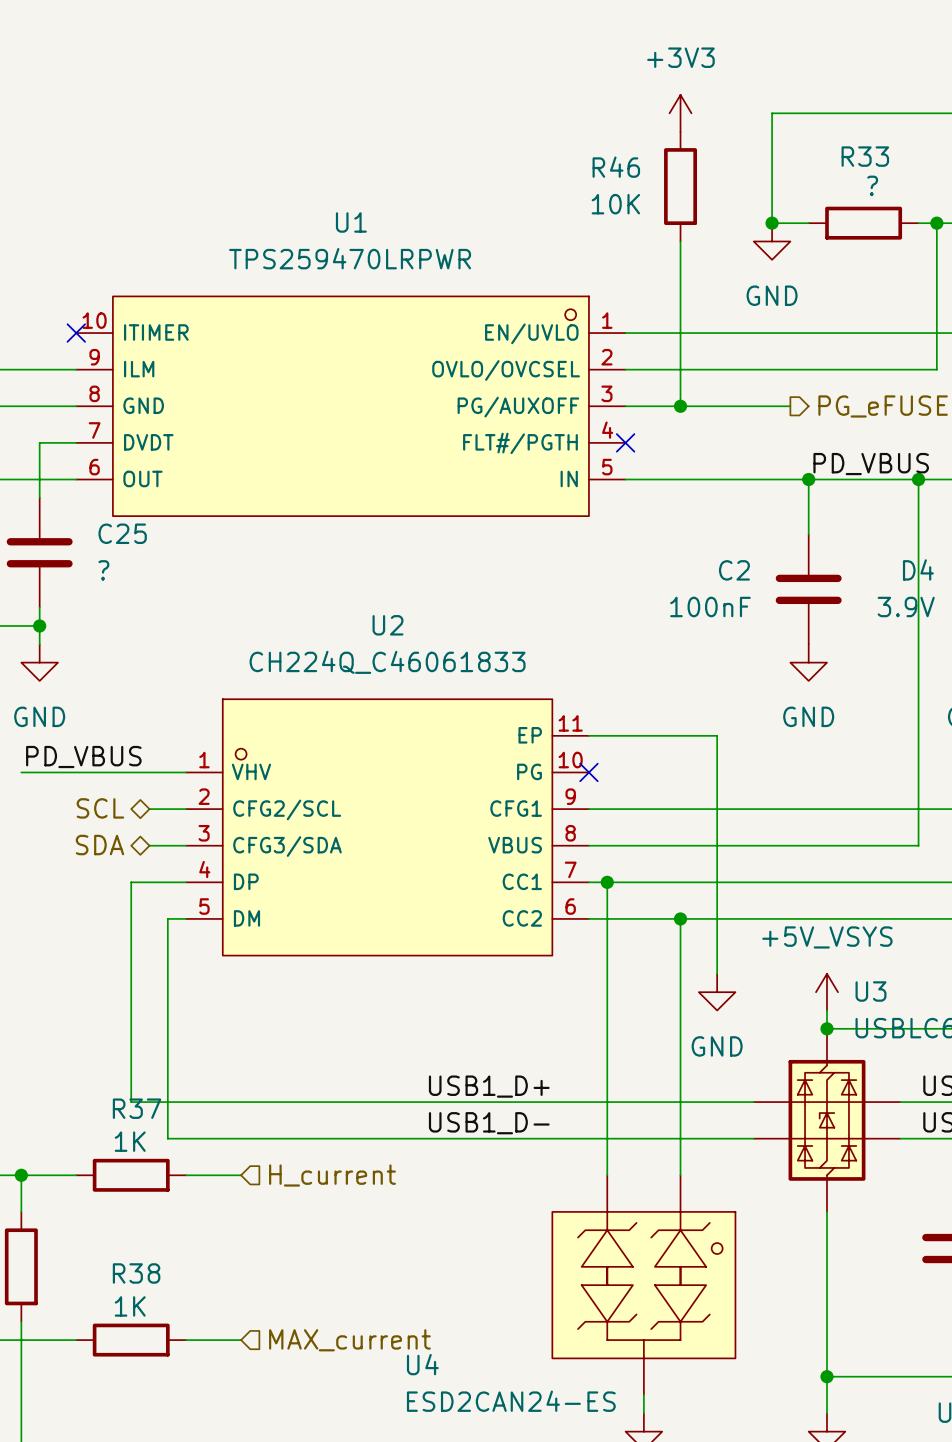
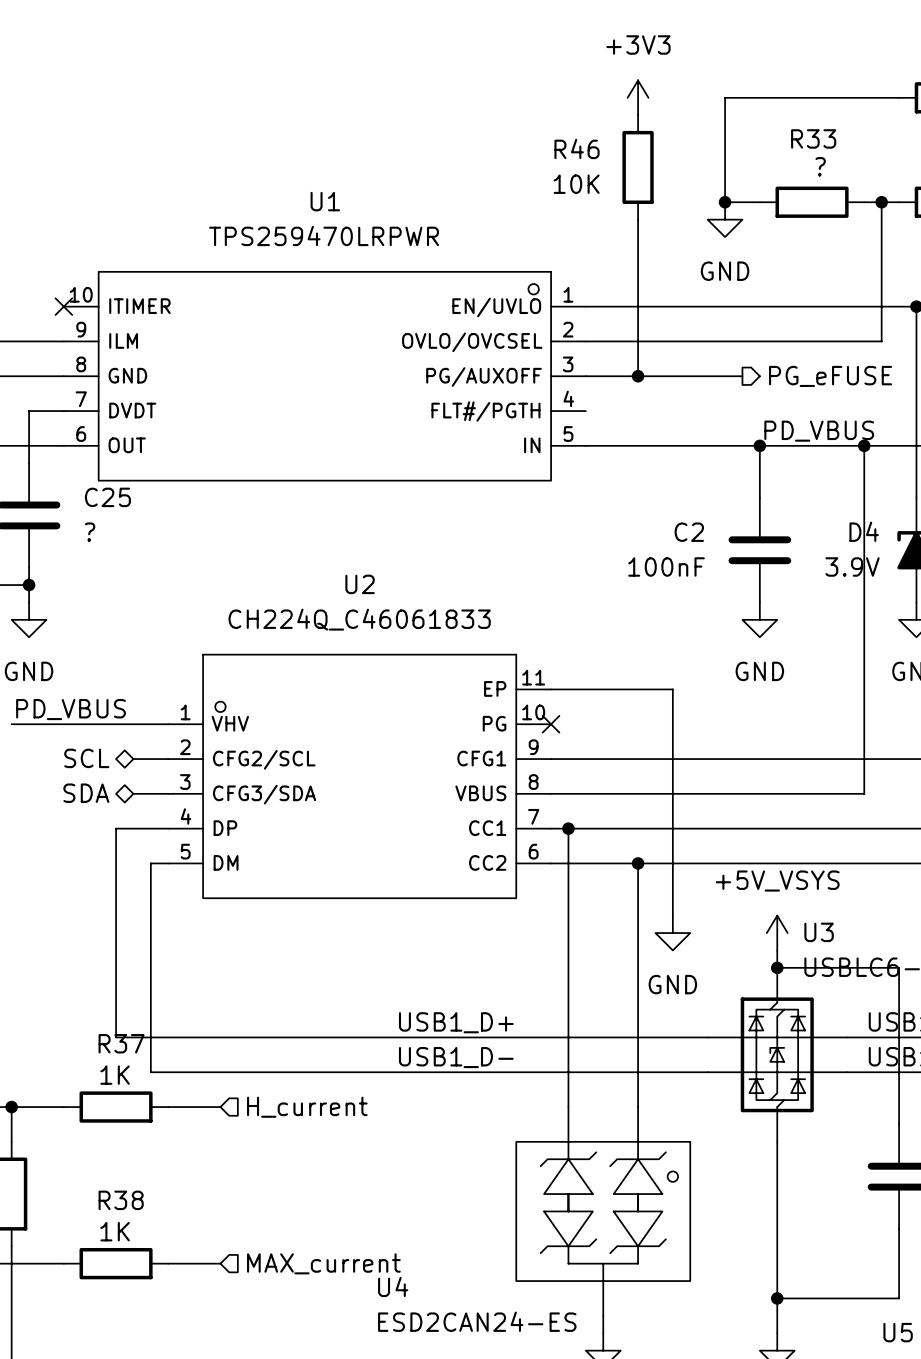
no-connect mark: (625, 442) -> none

